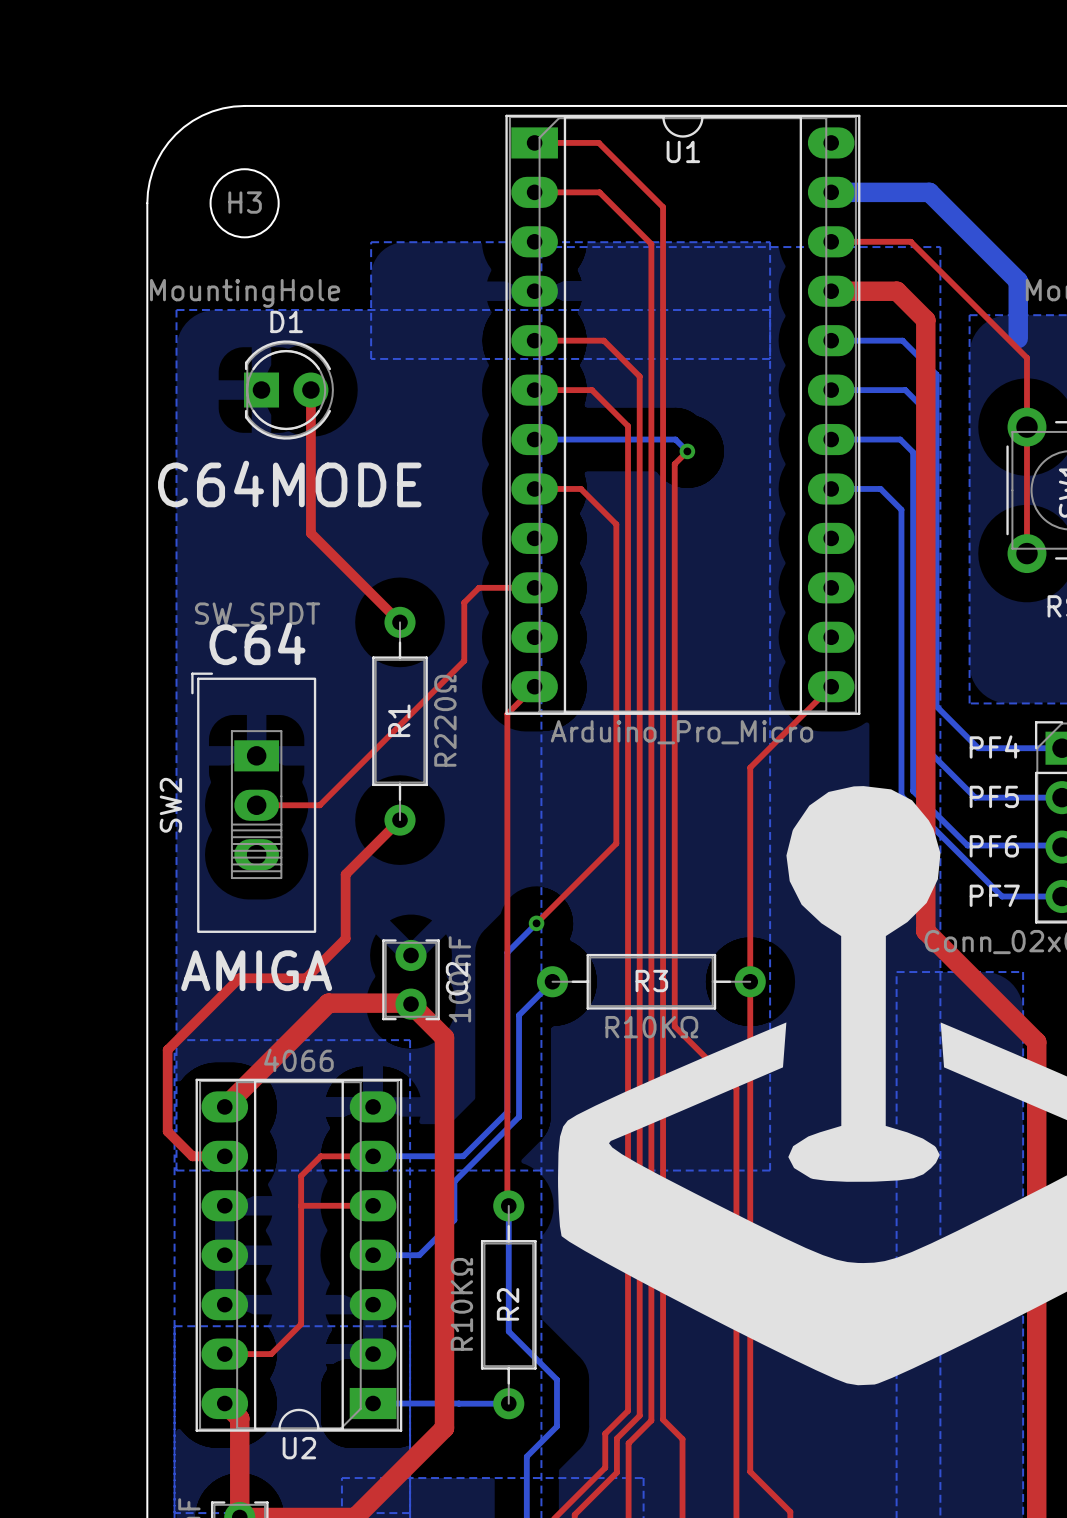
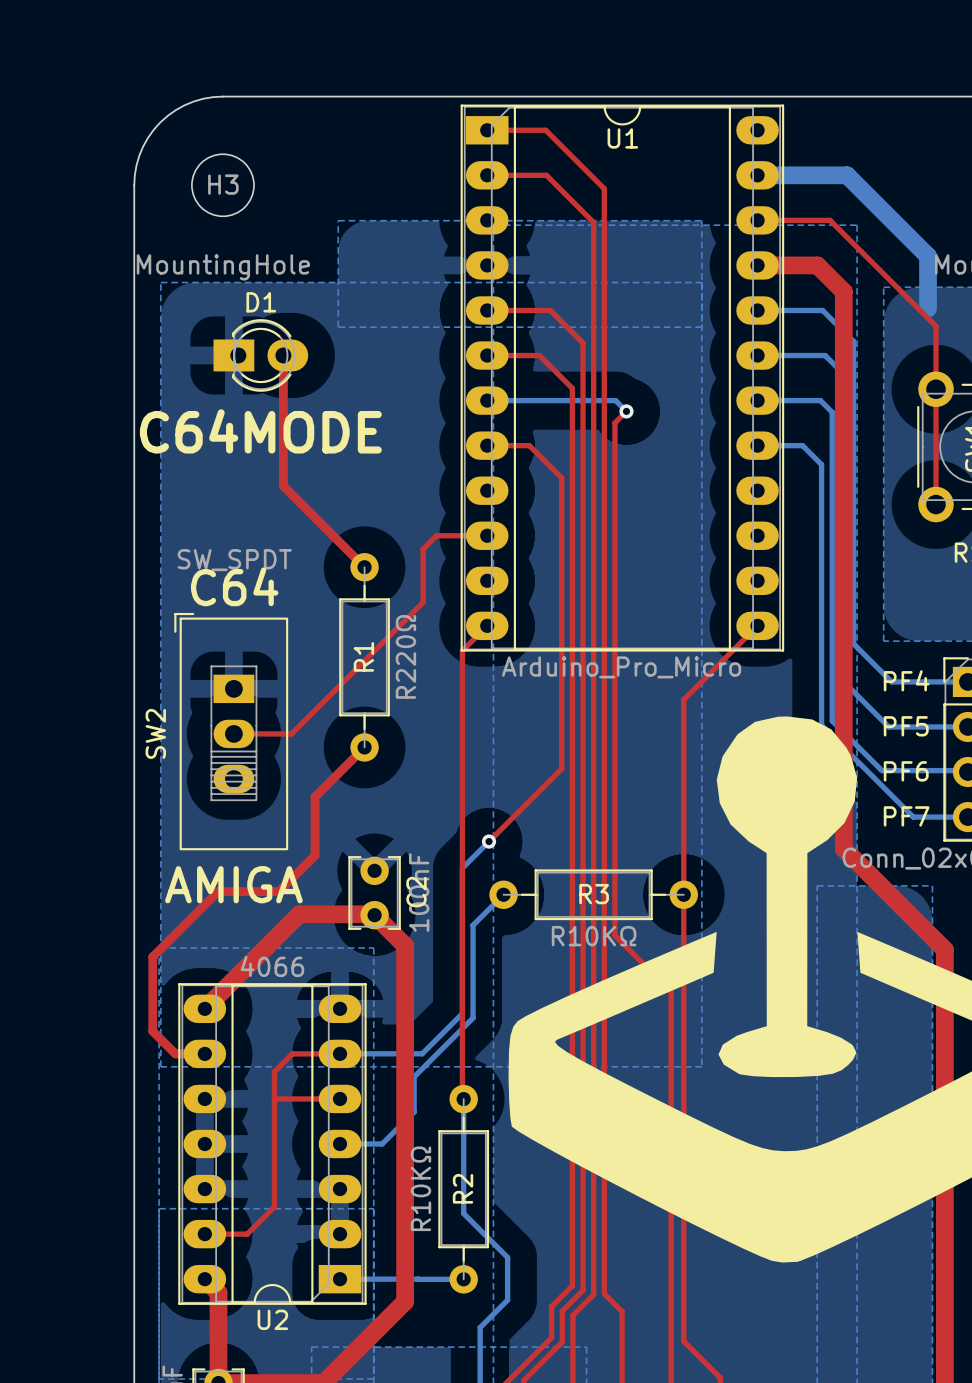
D1 footprint: [243, 340, 334, 440] -> [213, 319, 309, 392]

